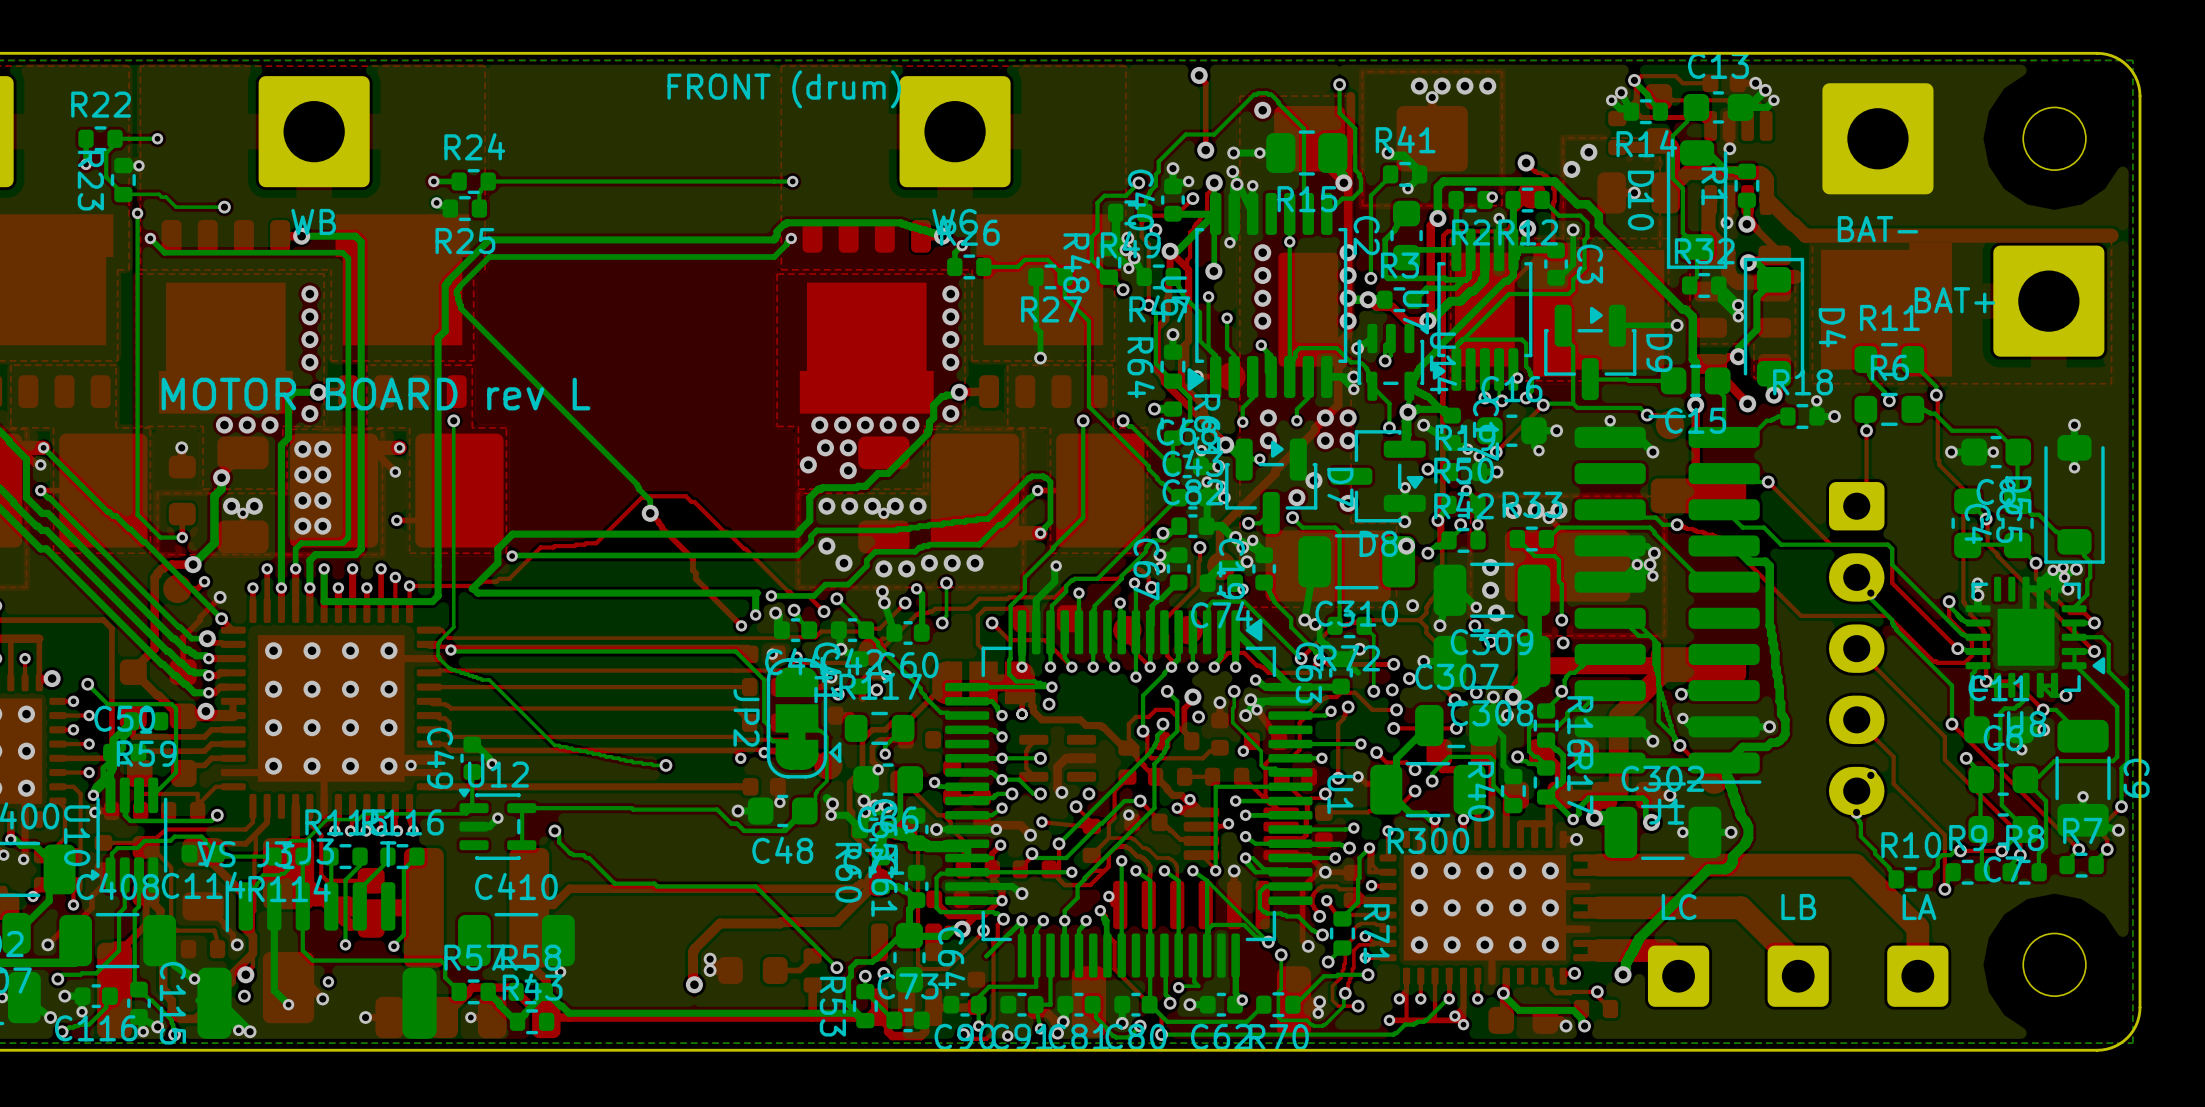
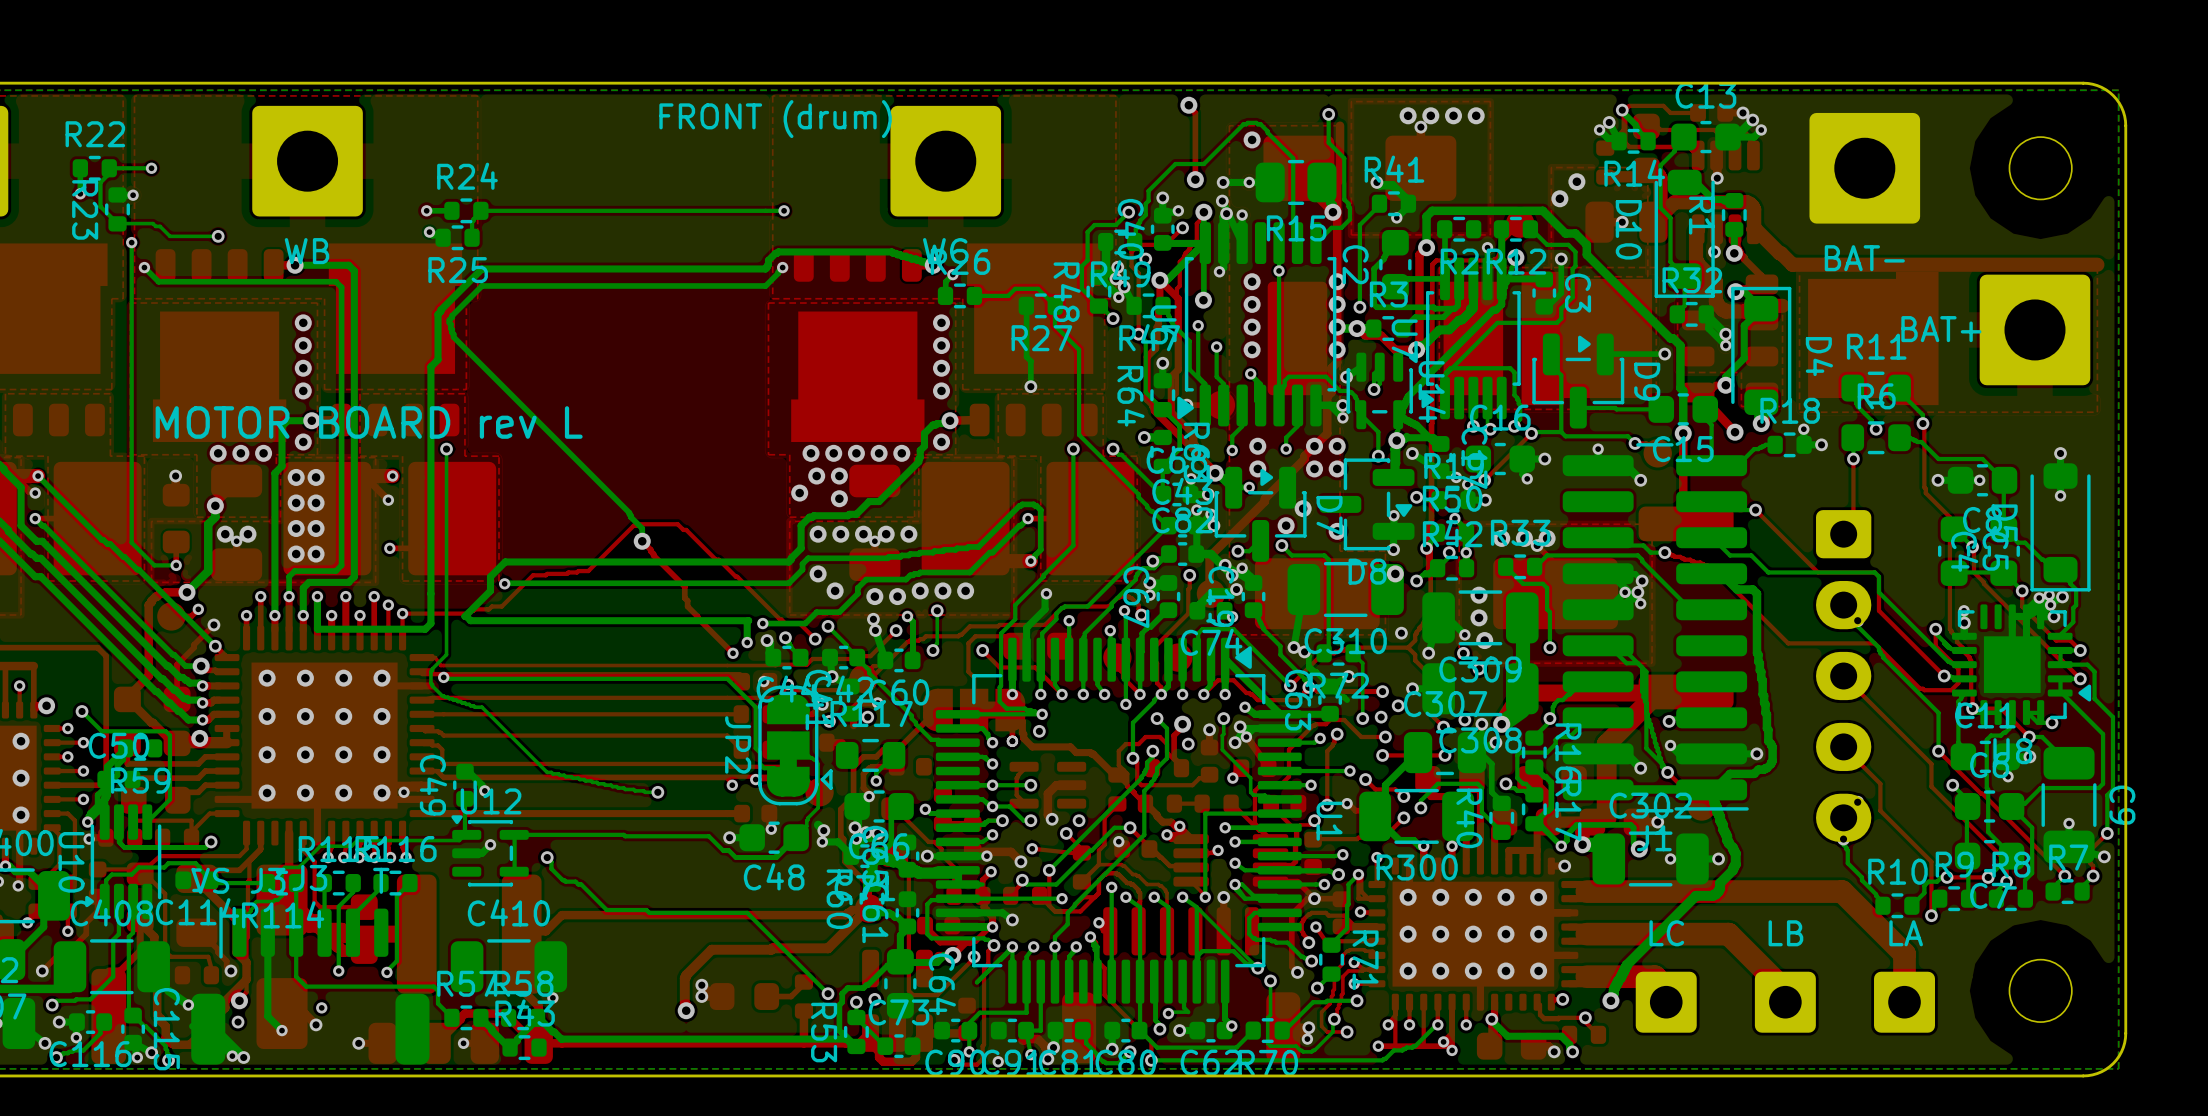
top track: (1526, 162) (1534, 171) (1546, 175) (1553, 184) (1553, 241) (1484, 309) -> none
via: (1526, 162) -> none
via: (1492, 197) -> none
via: (1517, 378) -> none
via: (1563, 642) -> none

